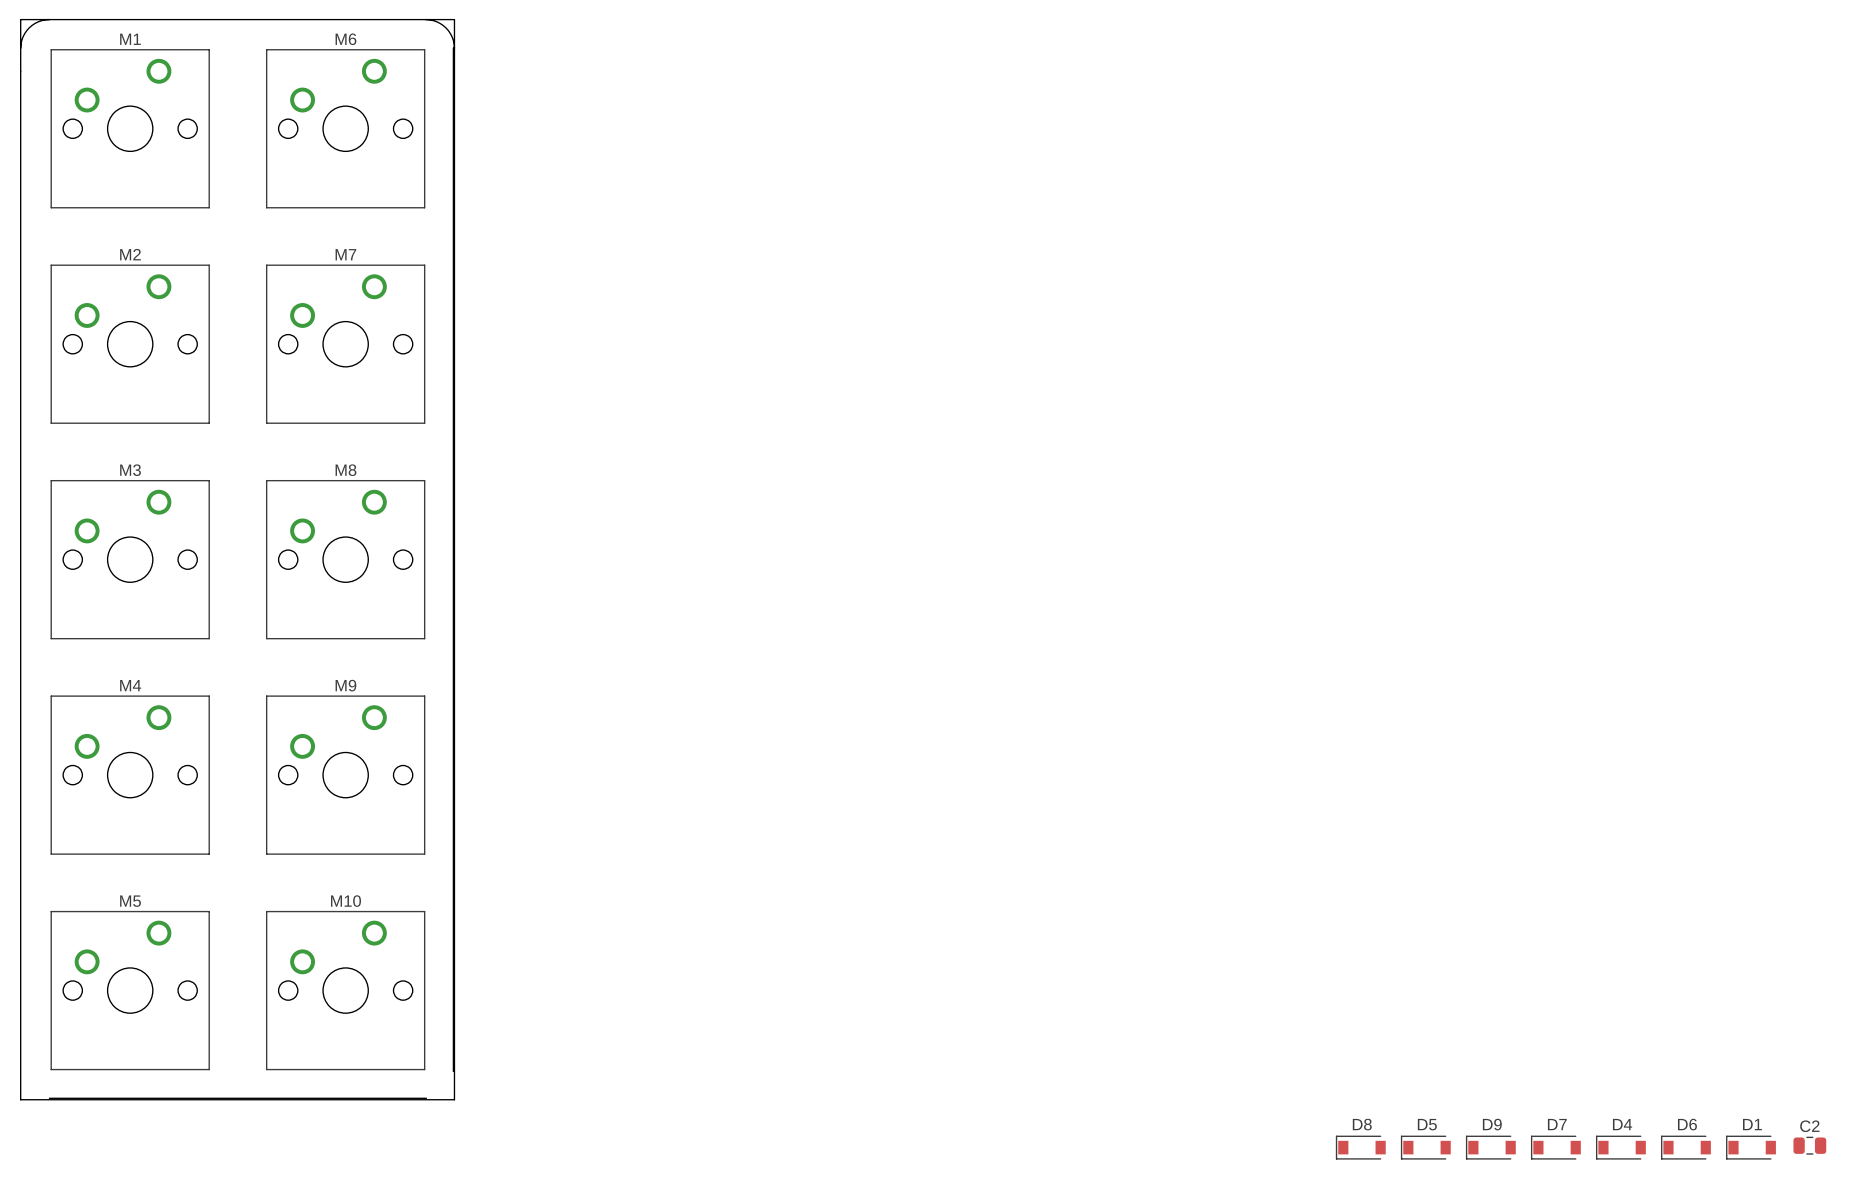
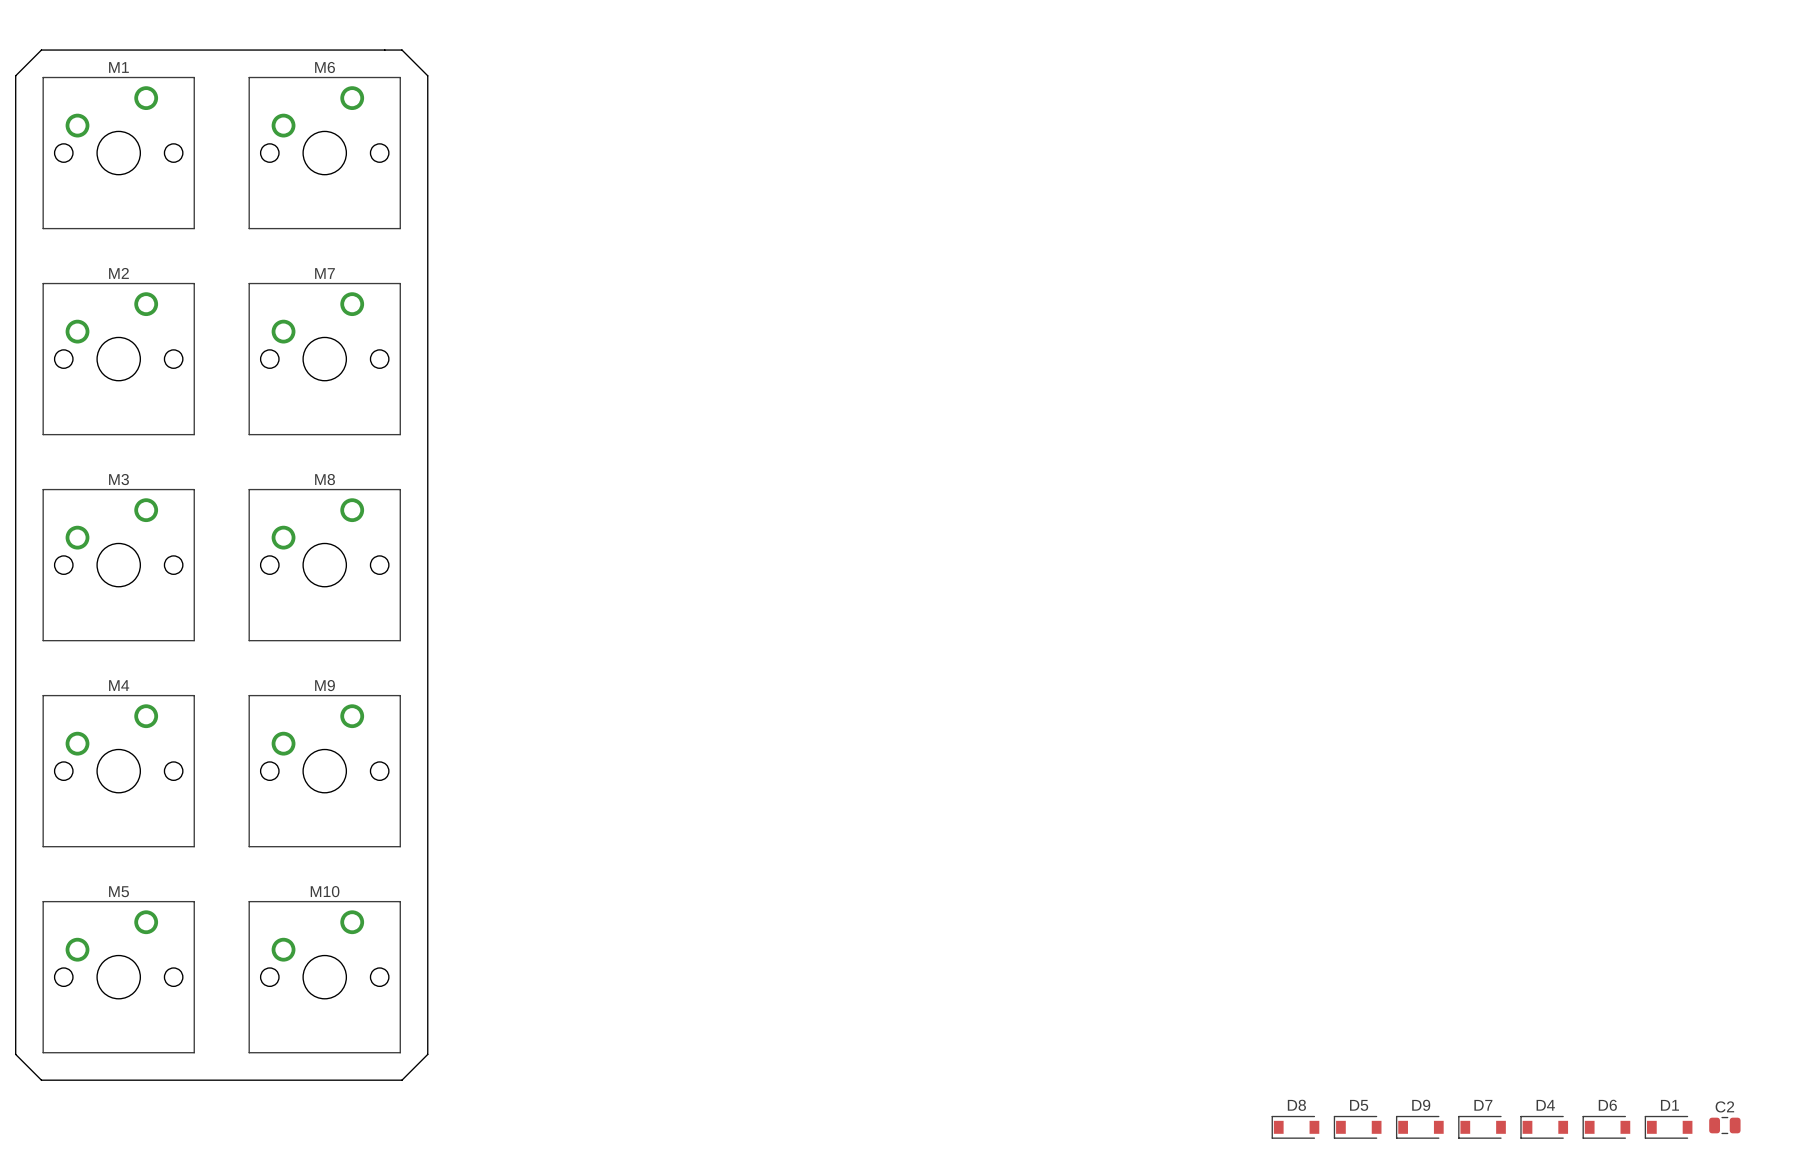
board edge: (20, 19) (20, 1099) (454, 1099) (454, 19) (20, 19) -> none
board edge: (49, 19) (38, 21) (29, 28) (22, 37) (20, 48) -> none
board edge: (425, 19) (436, 21) (446, 28) (452, 37) (454, 48) -> none
board edge: none -> (427, 75) (402, 50) (41, 50) (15, 75) (15, 1054) (41, 1080)
board edge: none -> (427, 1054) (402, 1080)

